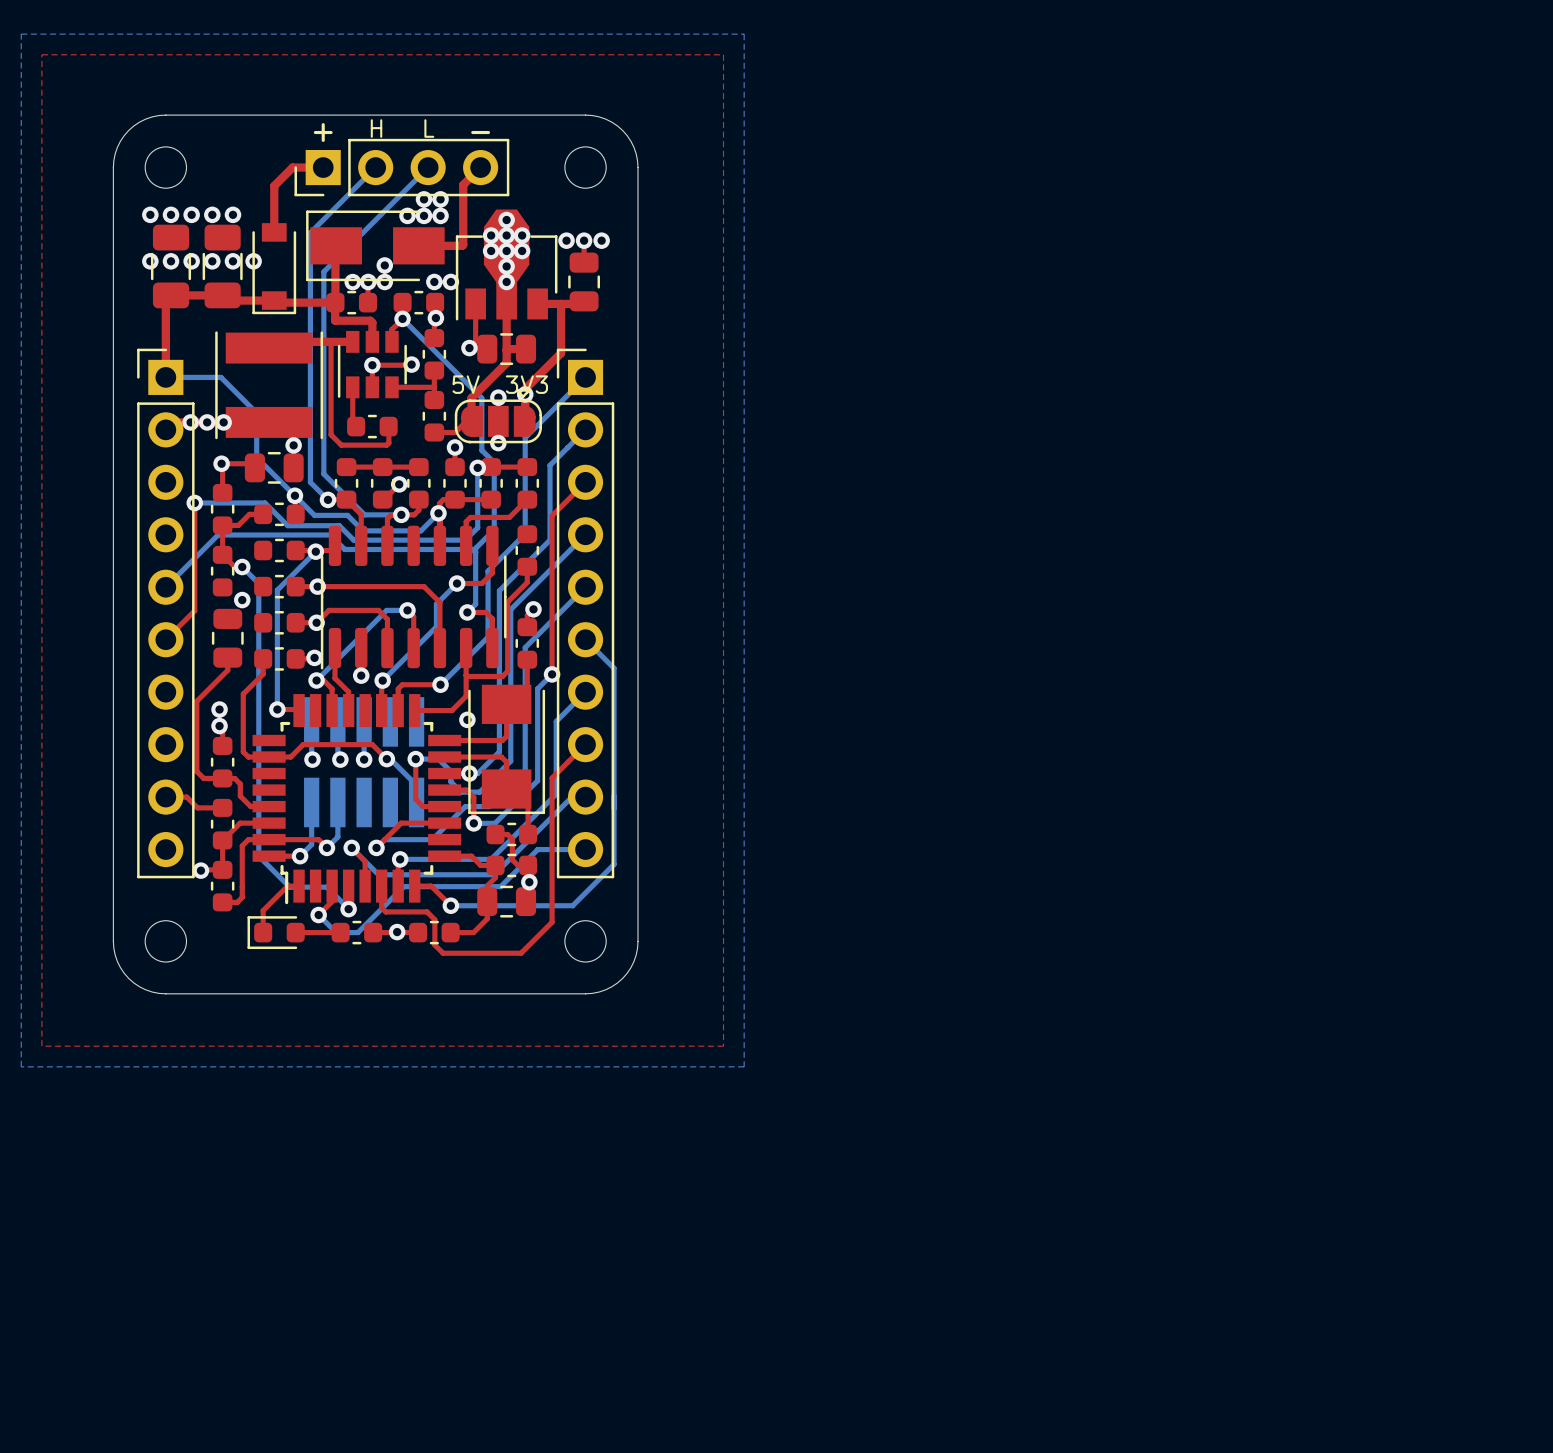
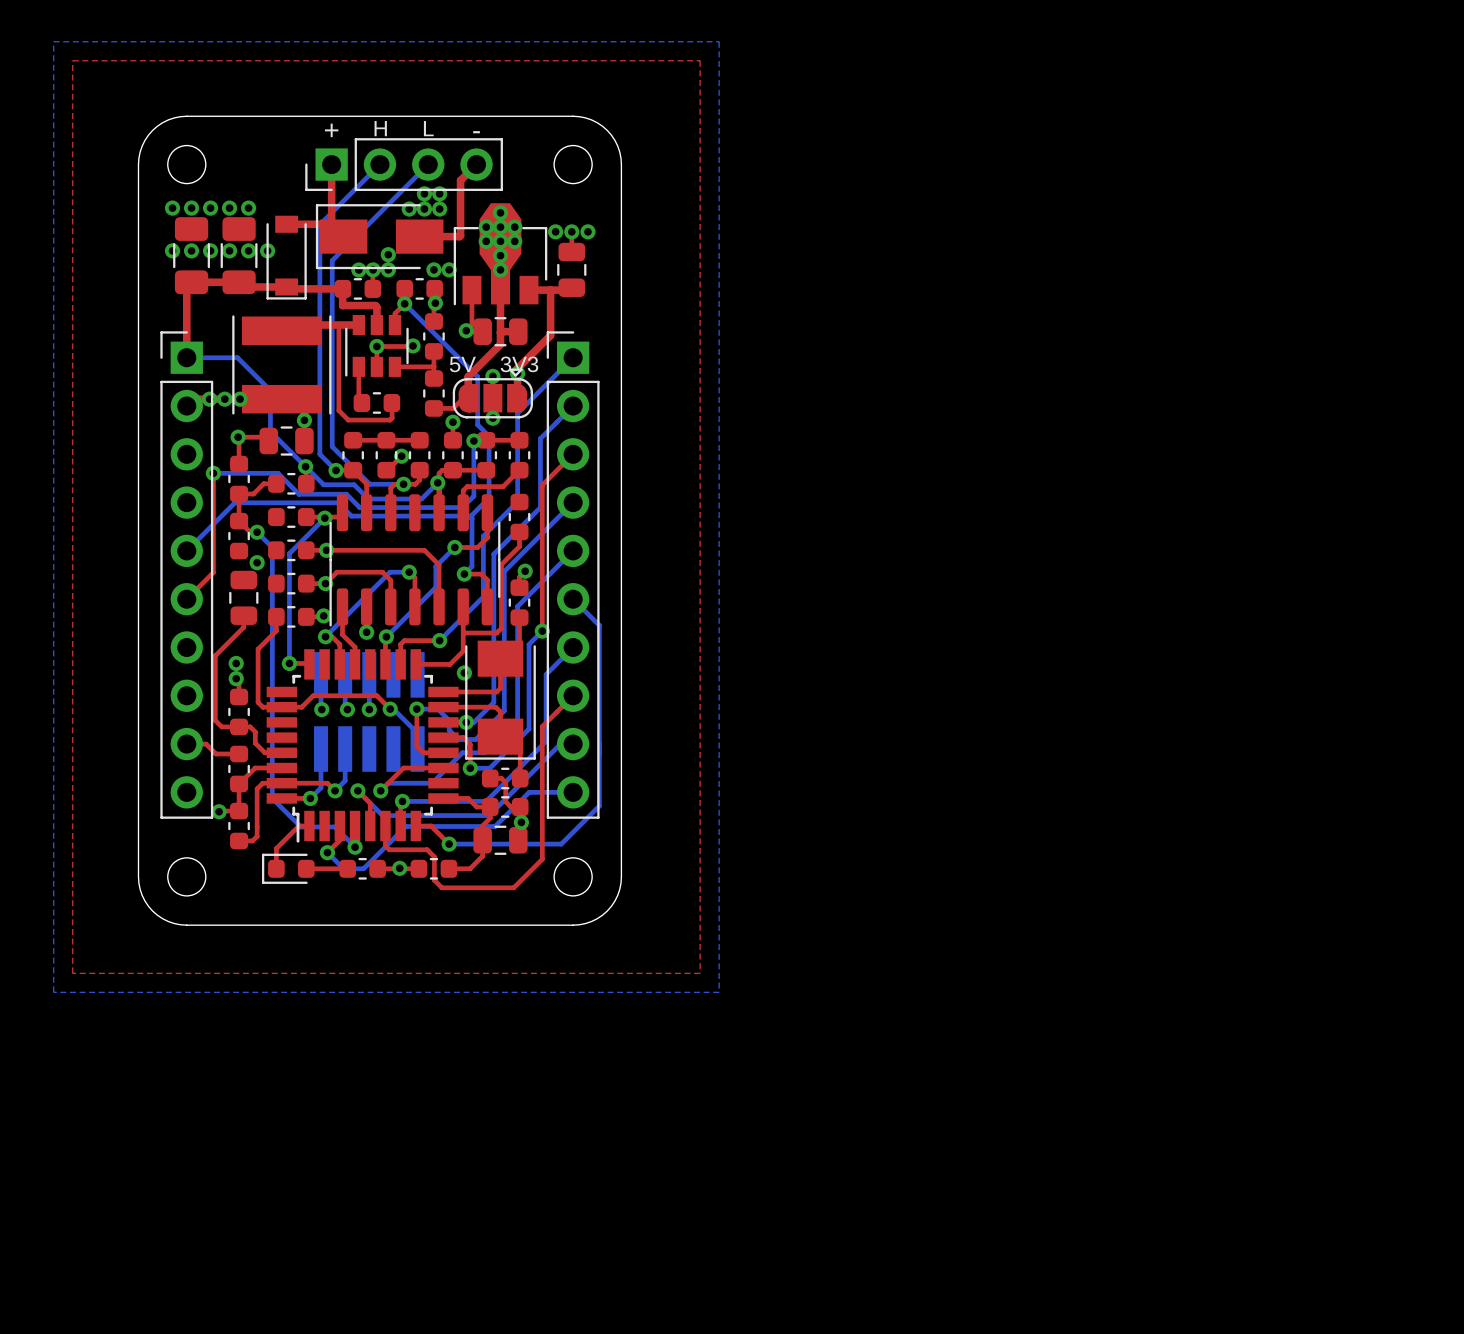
top track: (323, 167) (292, 167) (274, 185) (274, 232) -> (331, 164) (331, 224) (286, 224)
top track: (336, 245) (335, 302) -> none

